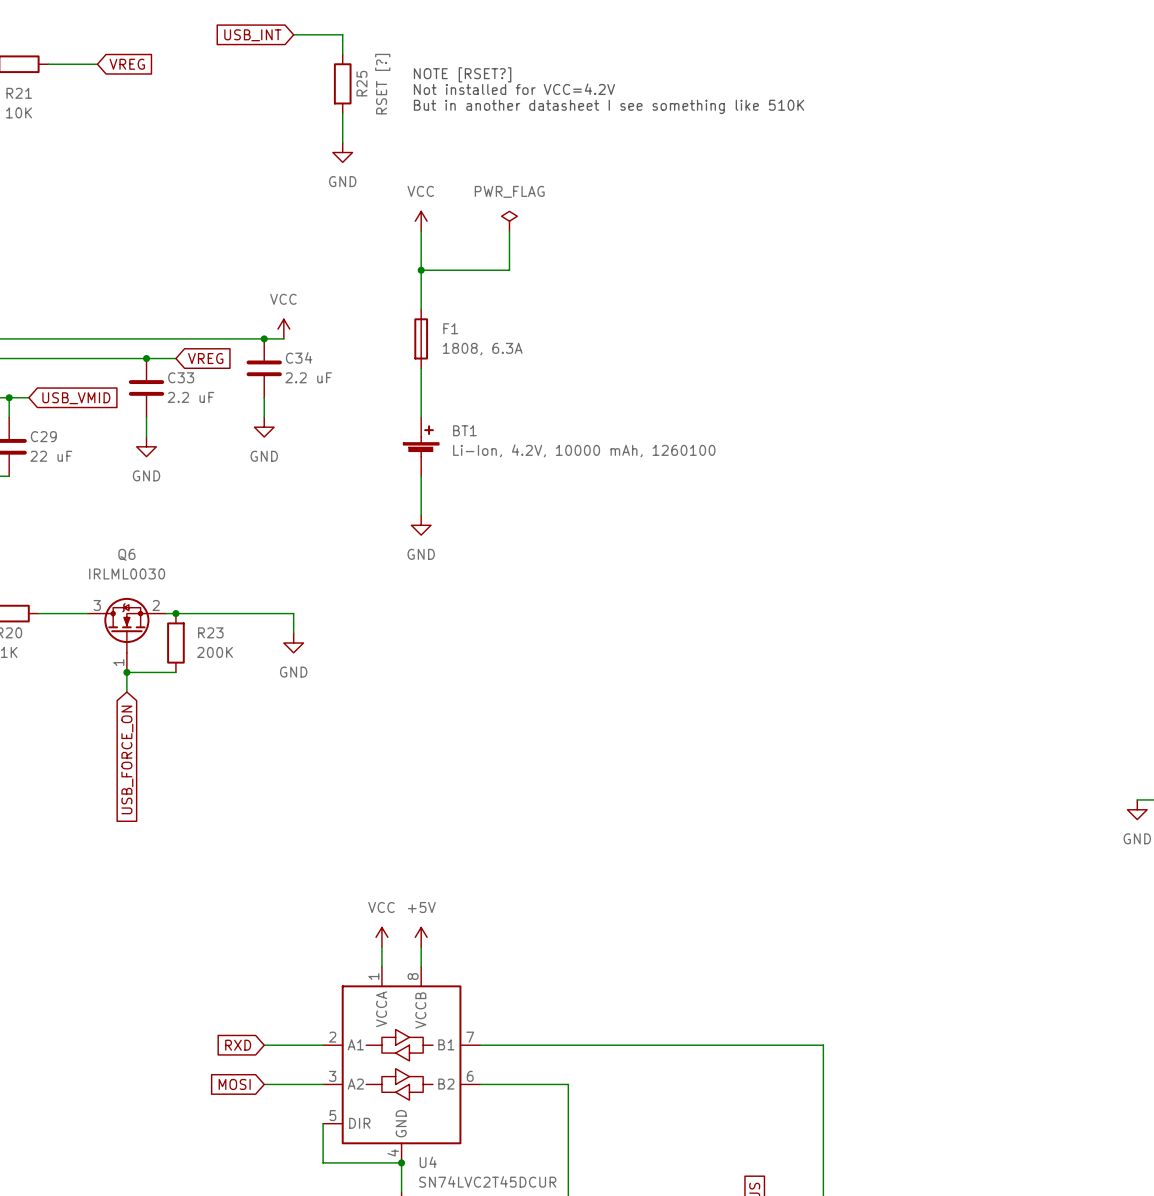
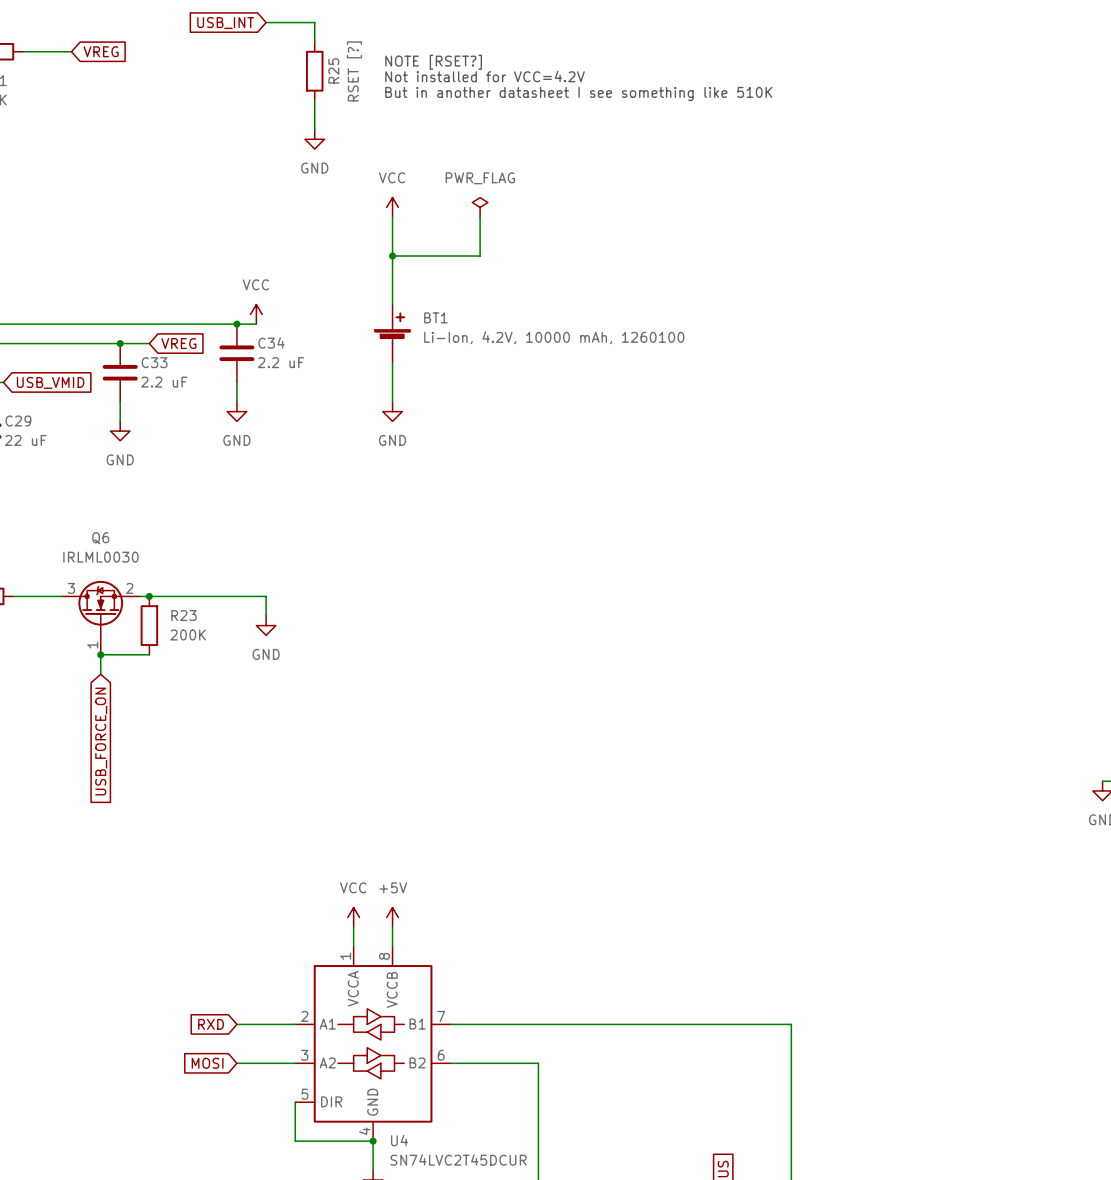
F1: 1808, 6.3A (421, 338) -> none
BT1 position: (421, 446) -> (392, 333)
wire: (421, 476) (421, 515) -> none
power symbol position: GND (421, 525) -> GND (392, 411)

